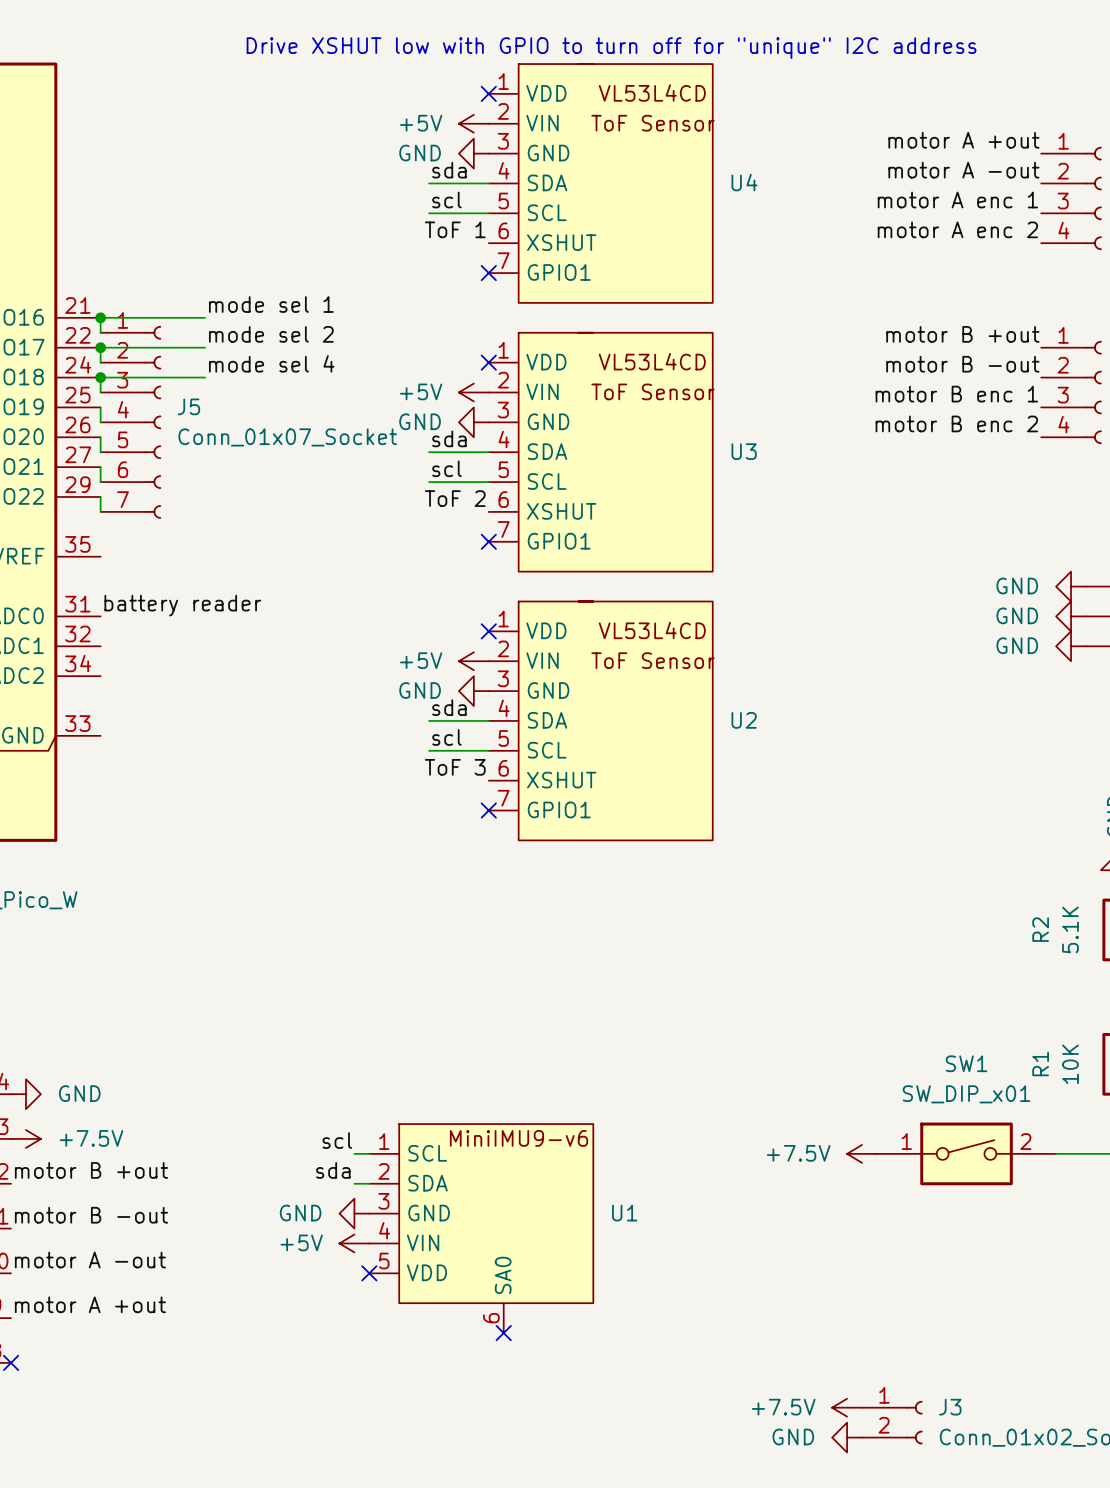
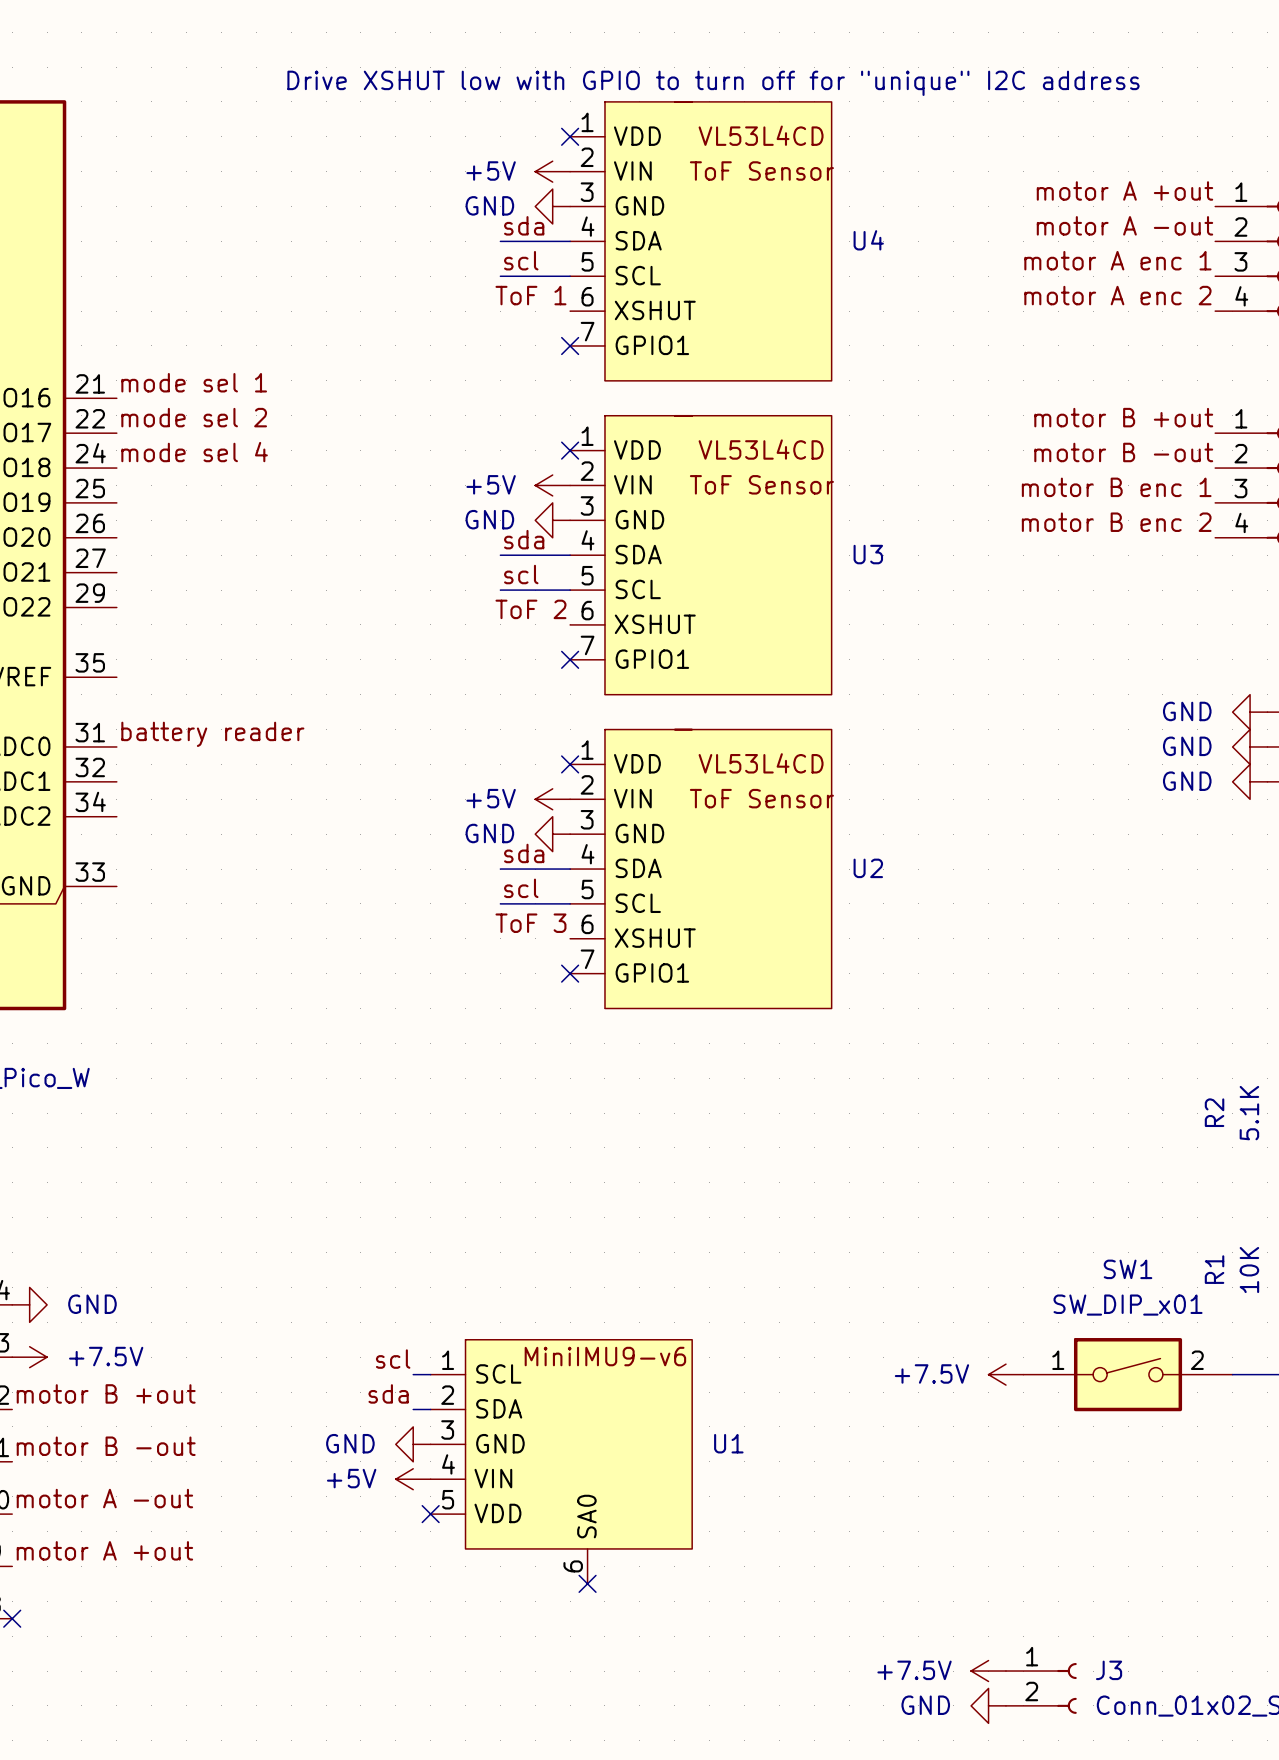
label position: mode sel 1 (271, 304) -> mode sel 1 (194, 382)
junction: (100, 317) -> none
wire: (205, 317) (100, 317) (100, 332) -> none
label position: mode sel 2 (271, 334) -> mode sel 2 (194, 417)
junction: (100, 347) -> none
wire: (205, 347) (100, 347) (100, 362) -> none
label position: mode sel 4 (271, 363) -> mode sel 4 (194, 452)
junction: (100, 377) -> none
wire: (205, 377) (100, 377) (100, 392) -> none
wire: (100, 407) (100, 422) -> none
J5: Conn_01x07_Socket (130, 422) -> none
wire: (100, 437) (100, 452) -> none
wire: (100, 467) (100, 482) -> none
wire: (100, 496) (100, 511) -> none

